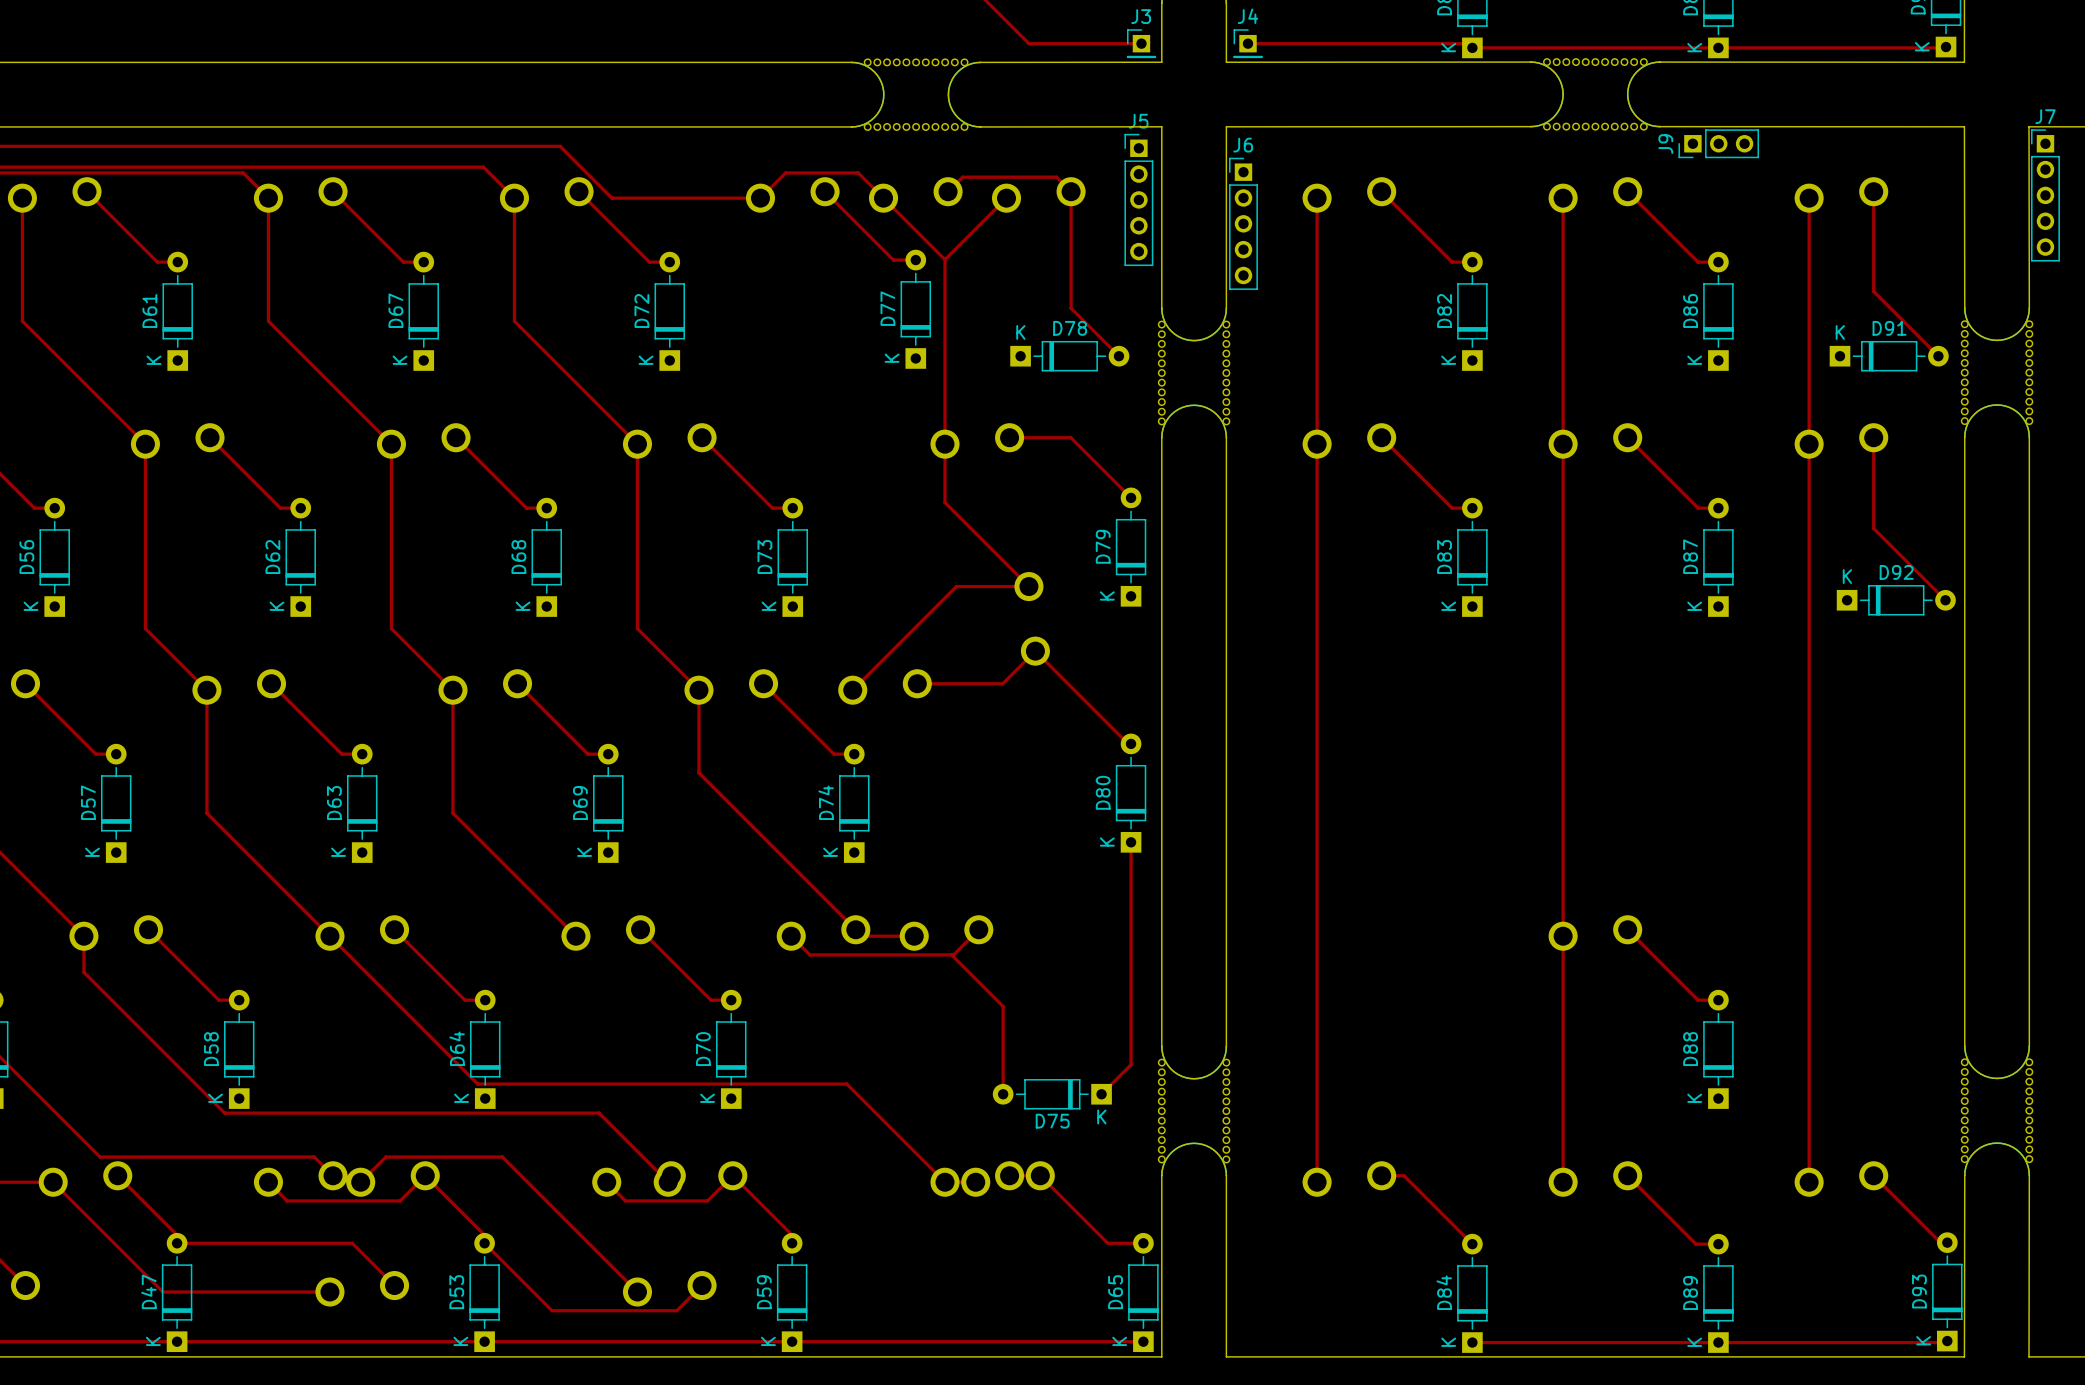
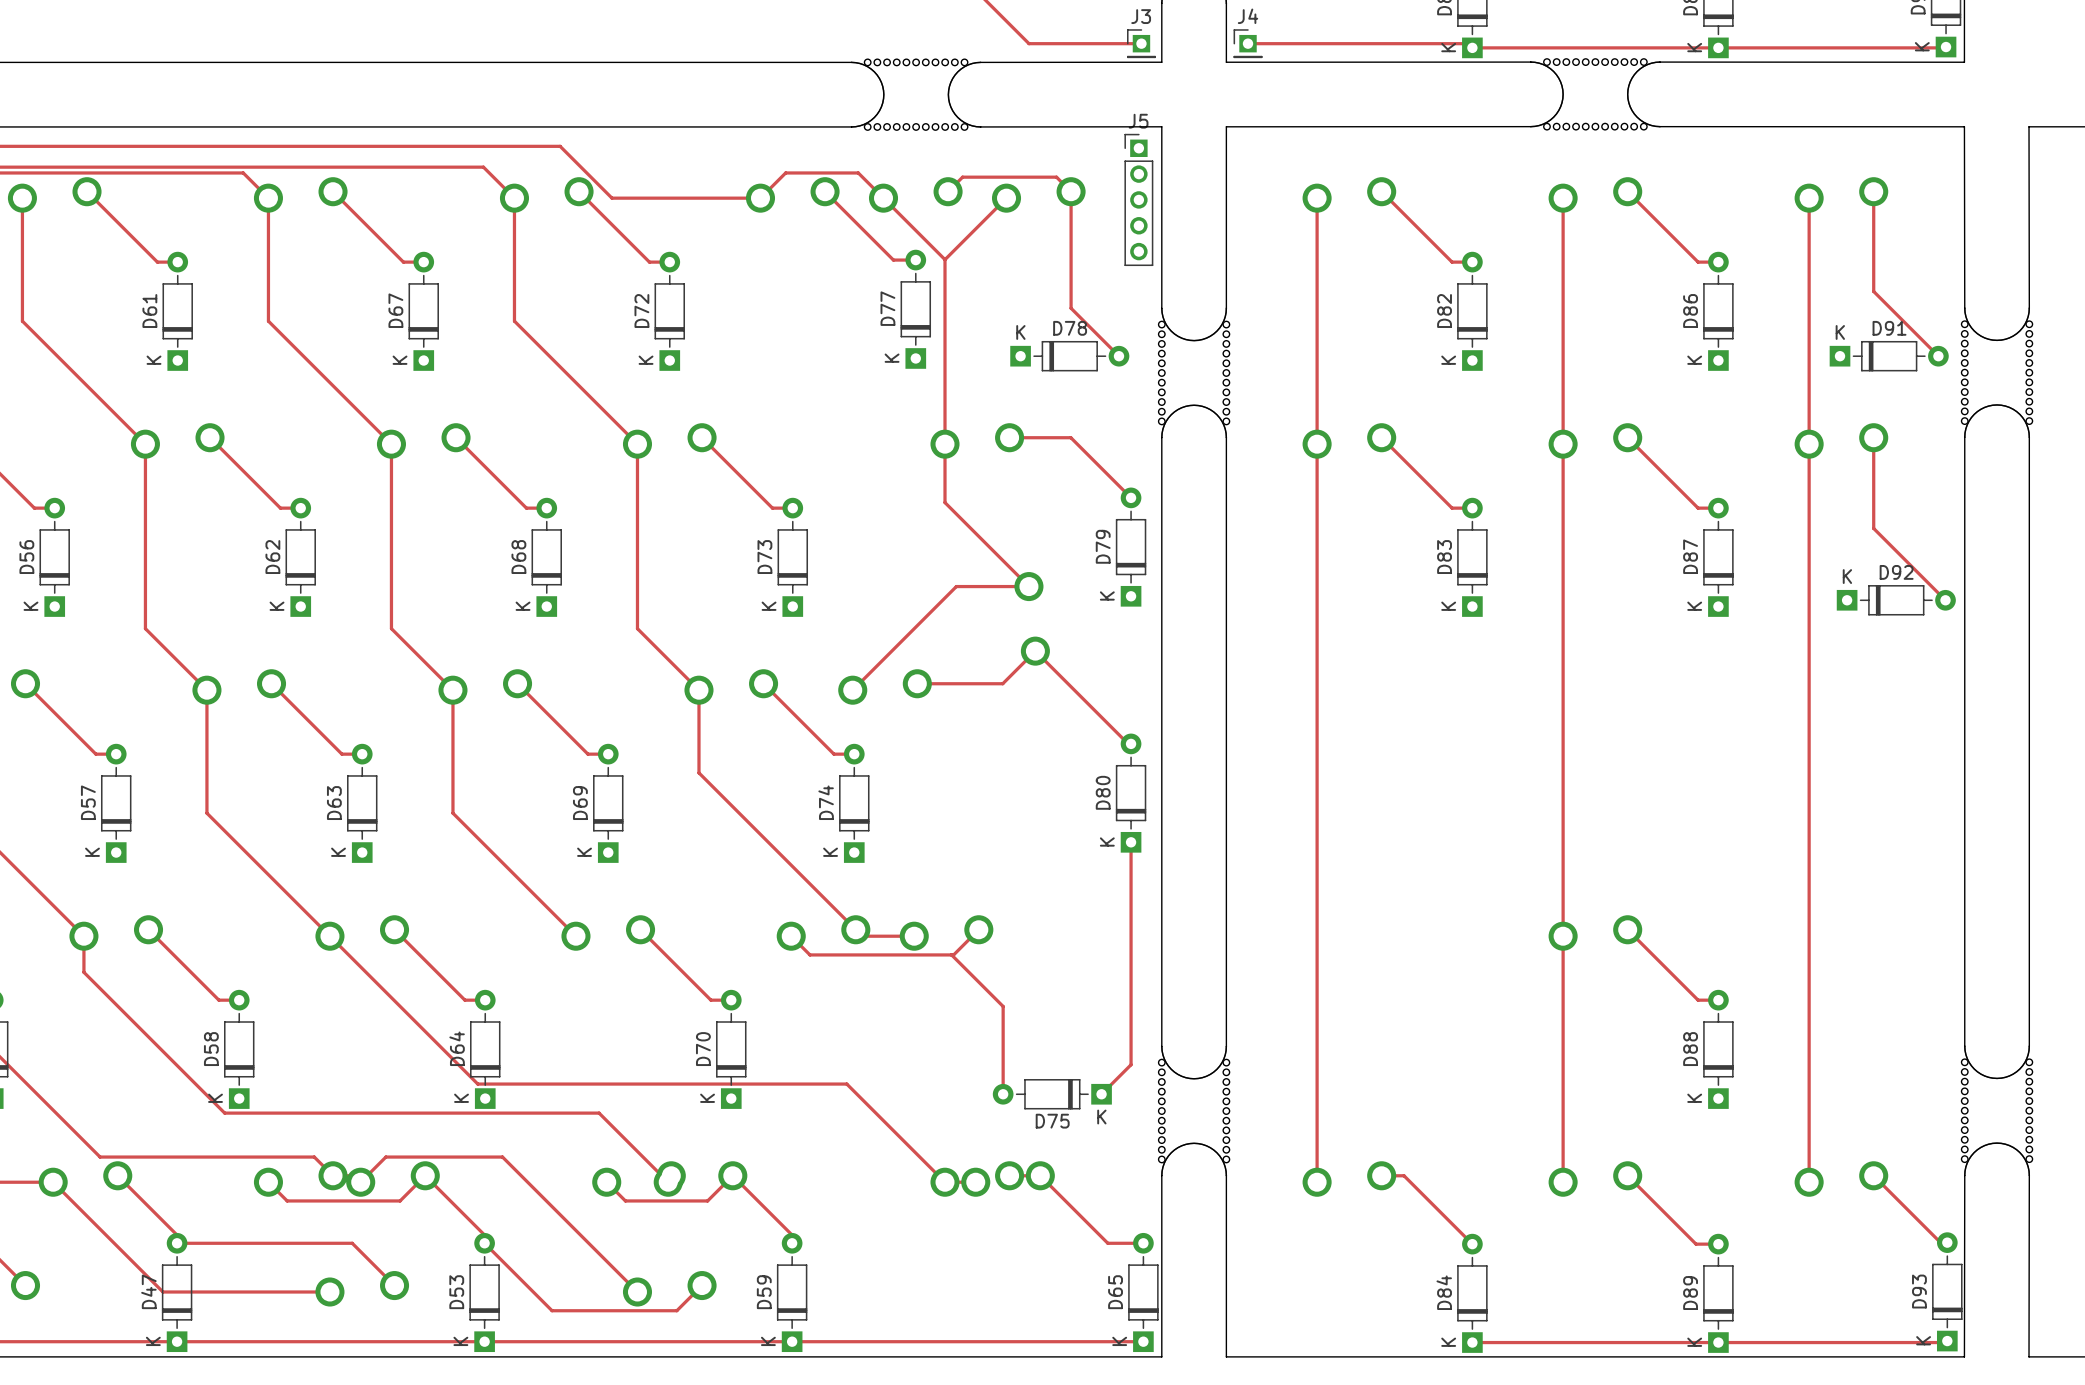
J9: (1718, 143) -> none
J7: (2045, 195) -> none
J6: (1243, 223) -> none

